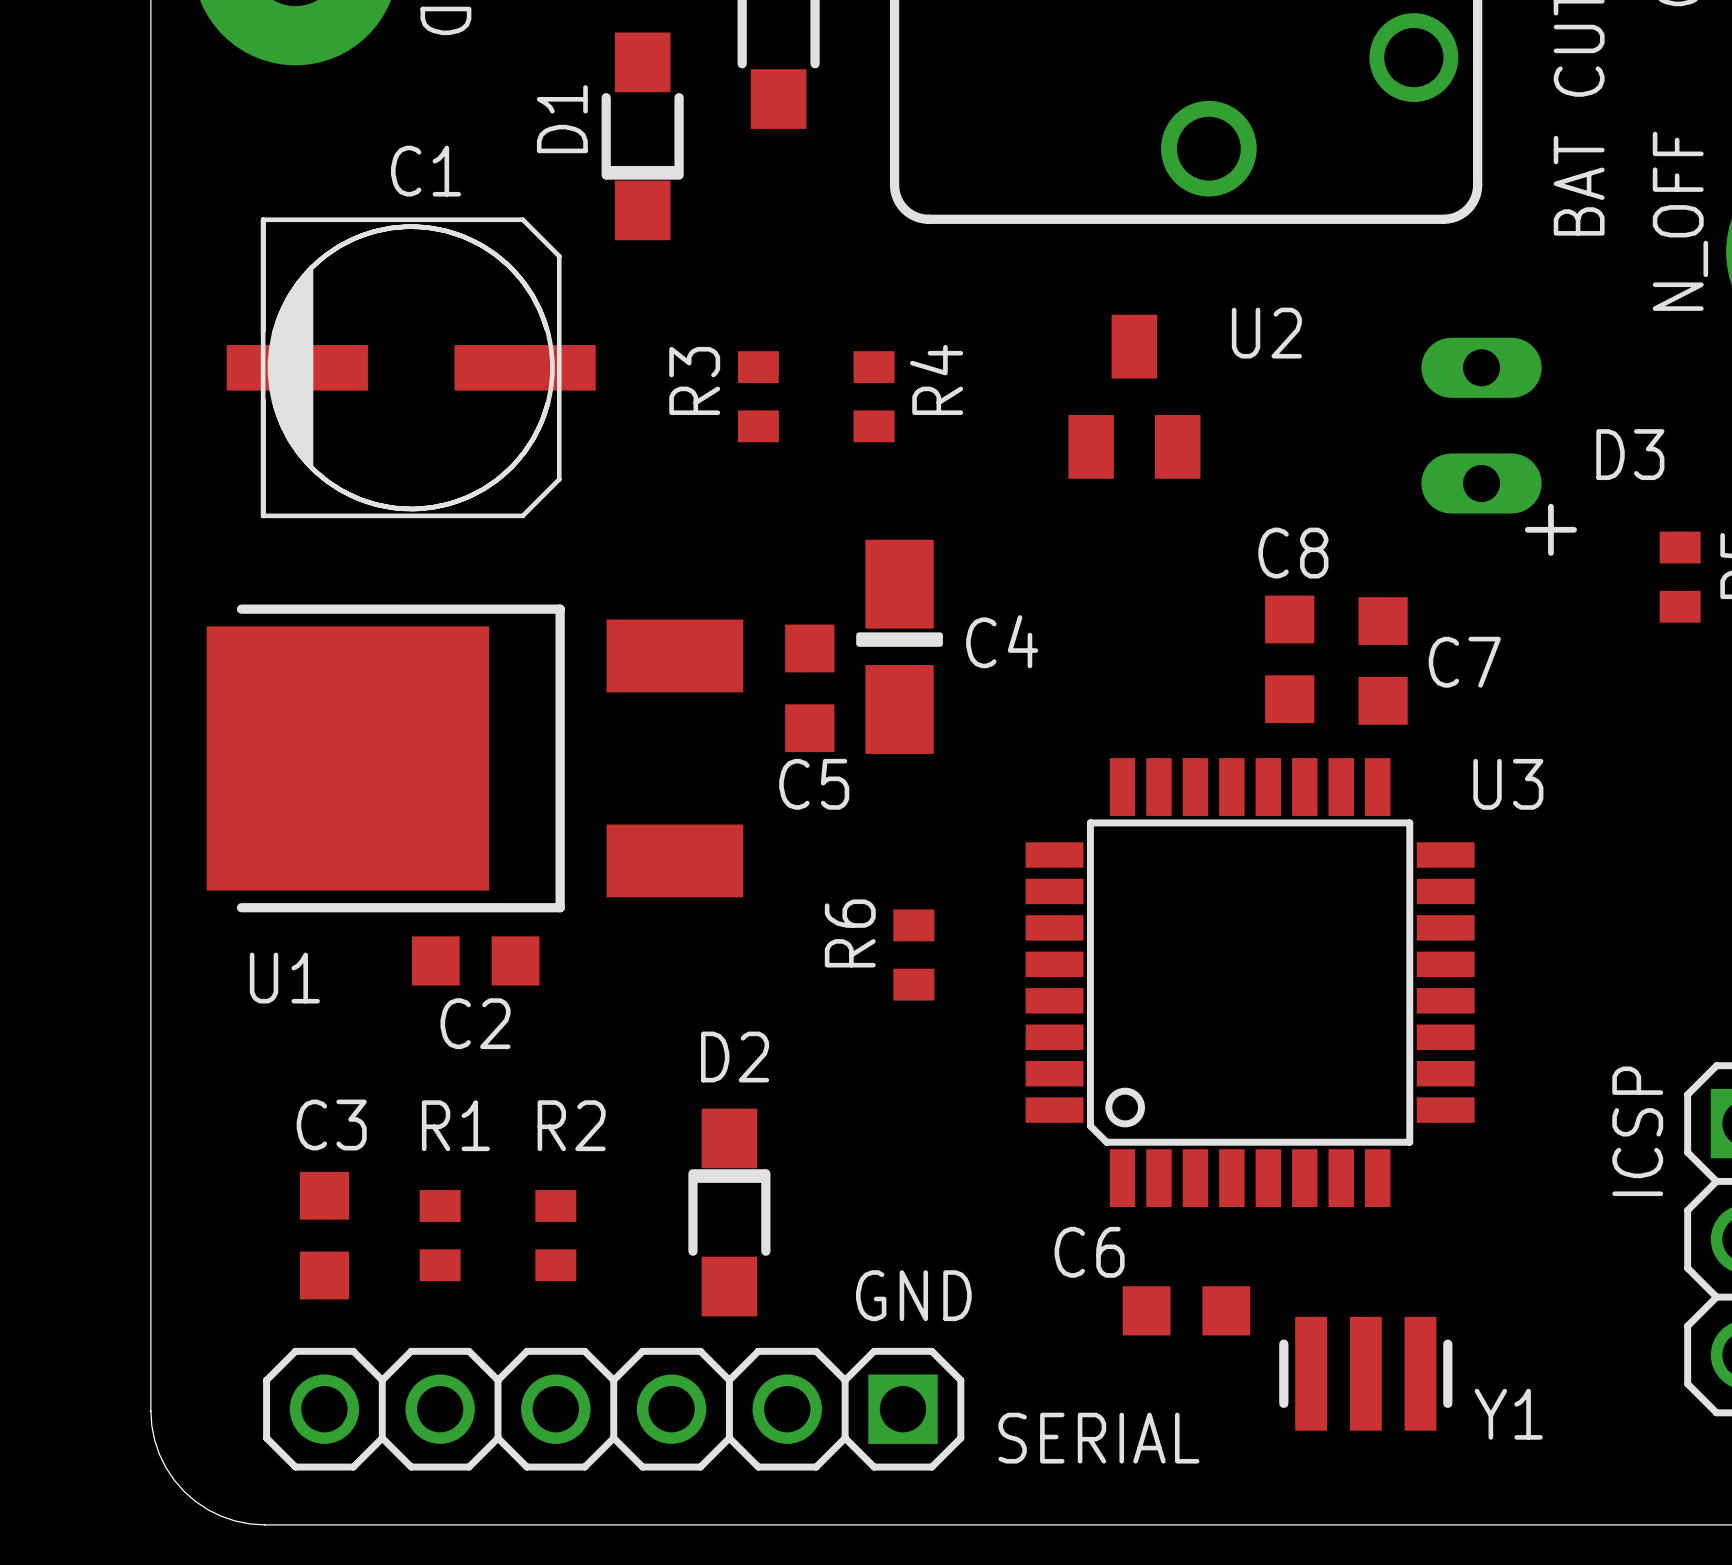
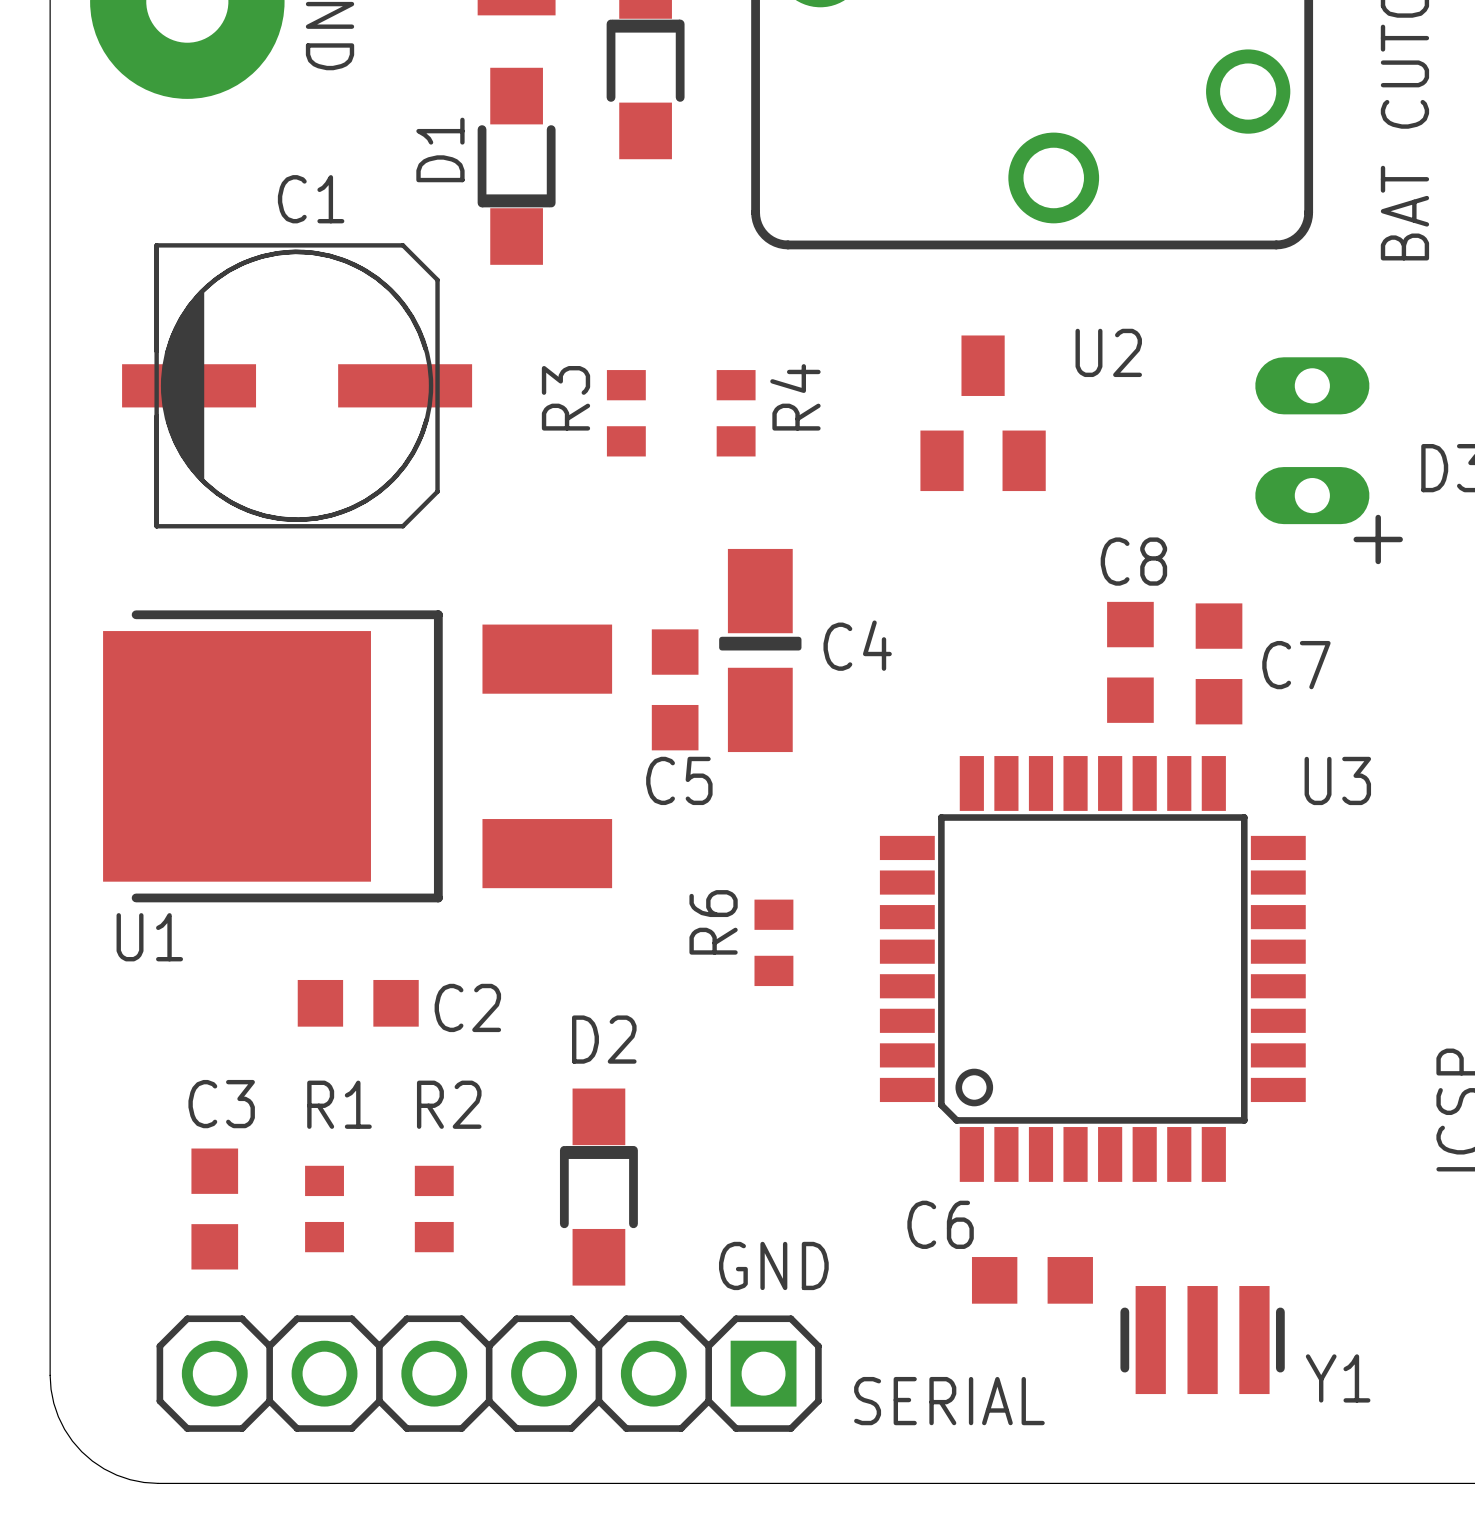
C2 position: (475, 960) -> (358, 1003)
U1 name position: U1 (284, 978) -> U1 (149, 937)
C2 name position: C2 (475, 1023) -> C2 (467, 1007)

